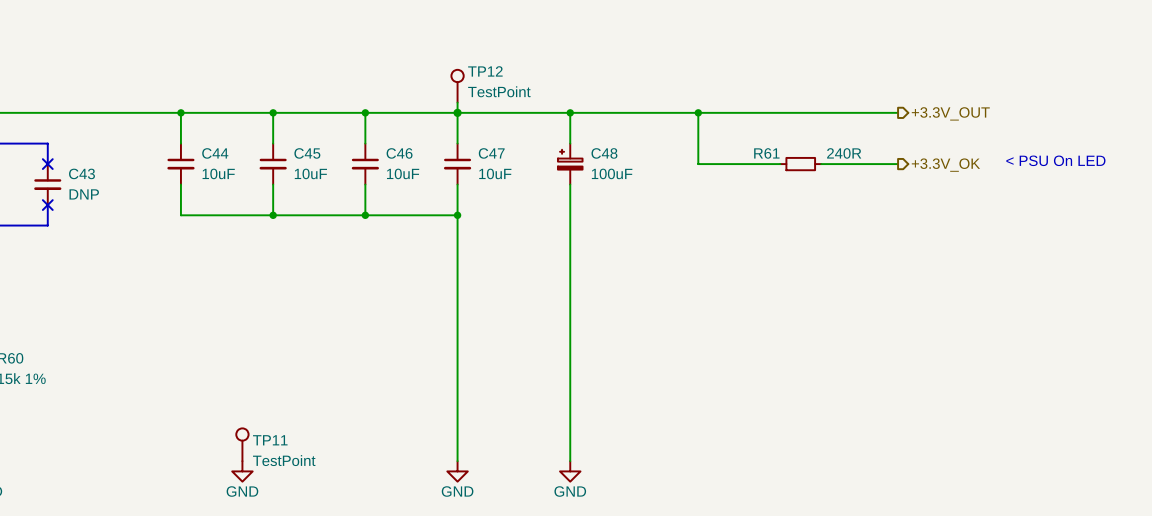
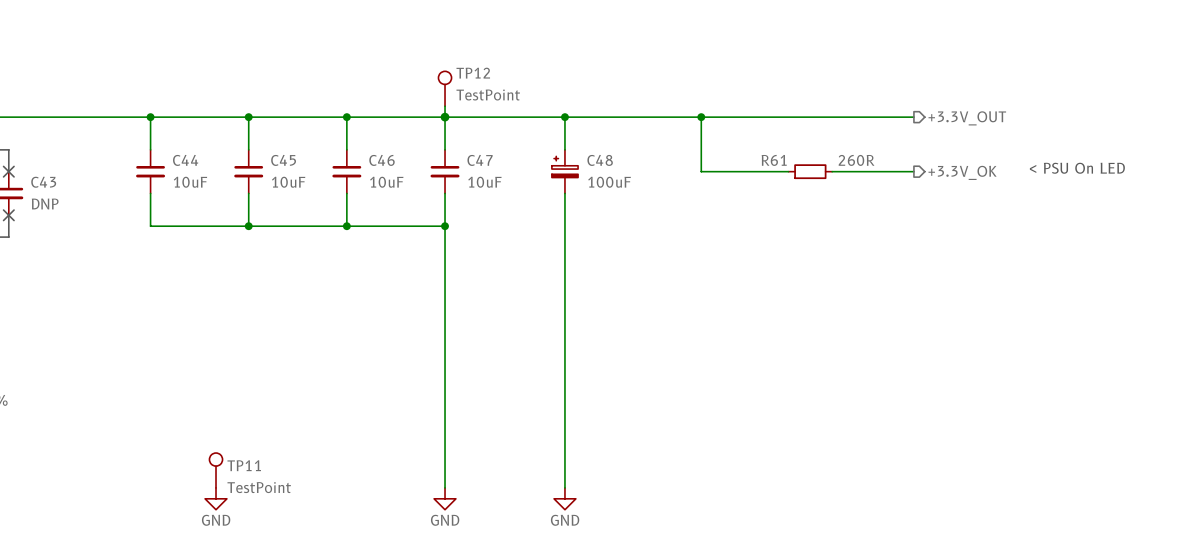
R61 value: 240R (844, 153) -> 260R (856, 160)

